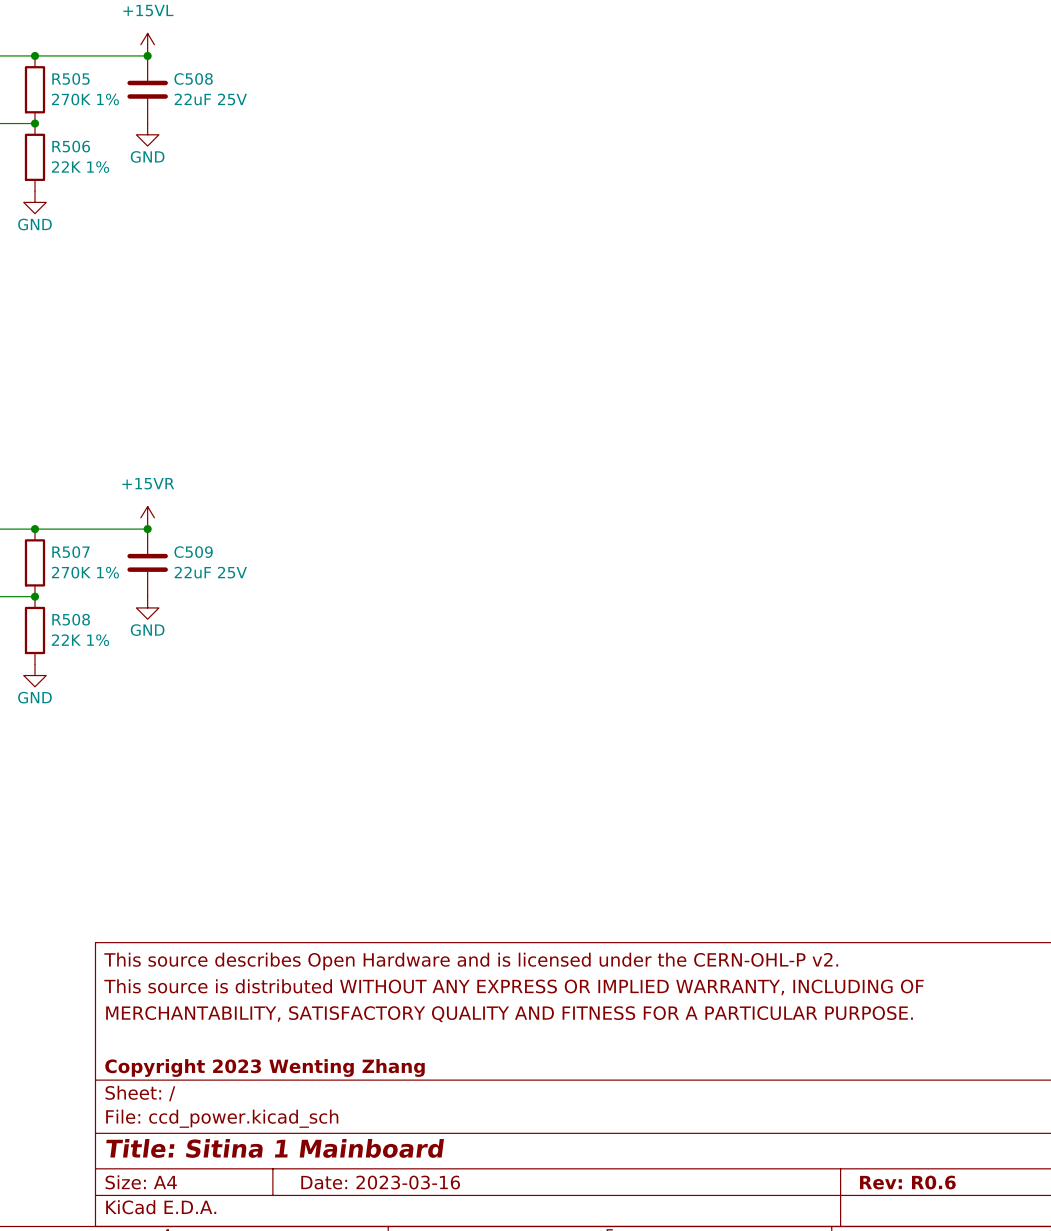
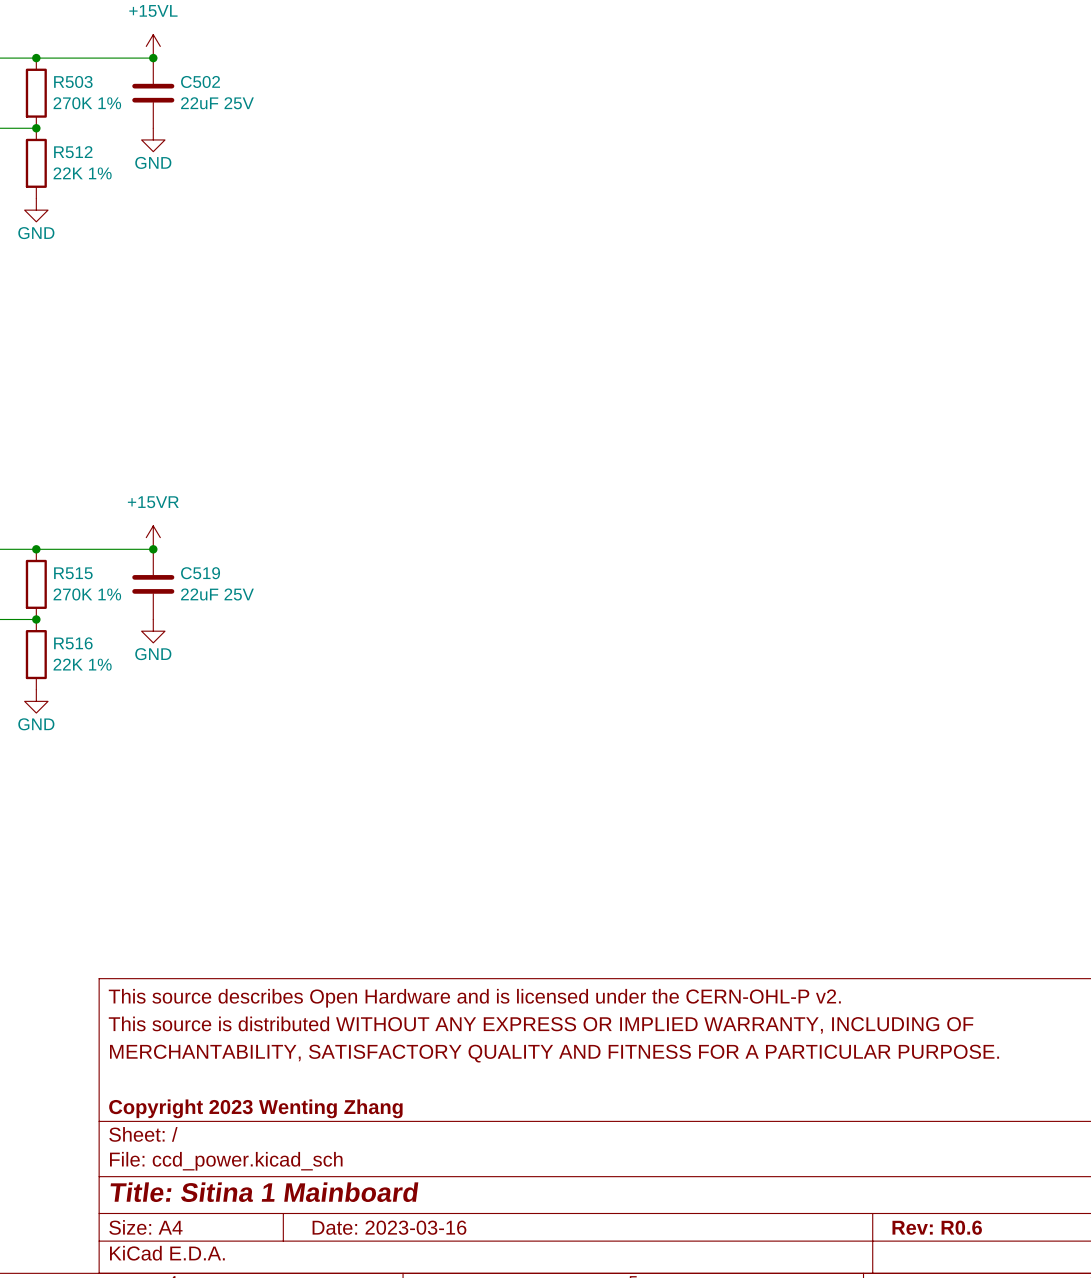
R505 name: R505 (70, 78) -> R503 (73, 81)
C508 name: C508 (193, 78) -> C502 (200, 81)
R506 name: R506 (71, 146) -> R512 (73, 152)
R507 name: R507 (70, 552) -> R515 (73, 573)
C509 name: C509 (193, 552) -> C519 (200, 573)
R508 name: R508 (71, 619) -> R516 (73, 643)

